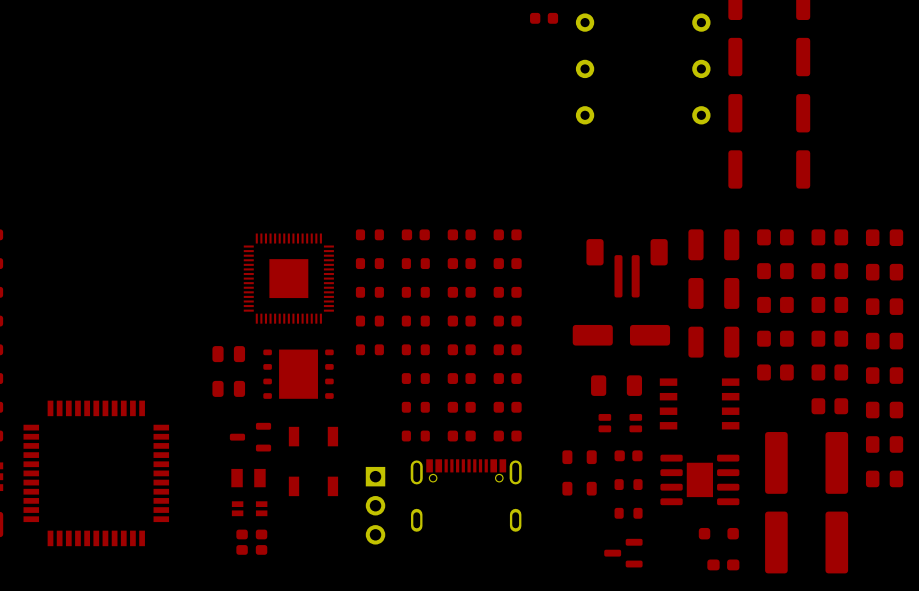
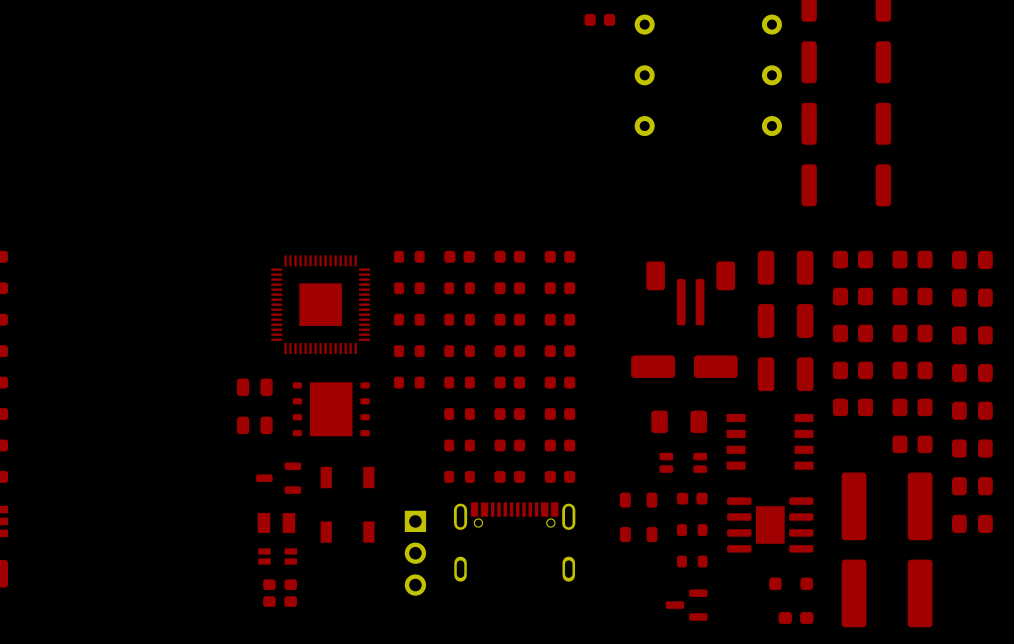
part: (96, 473) -> none

